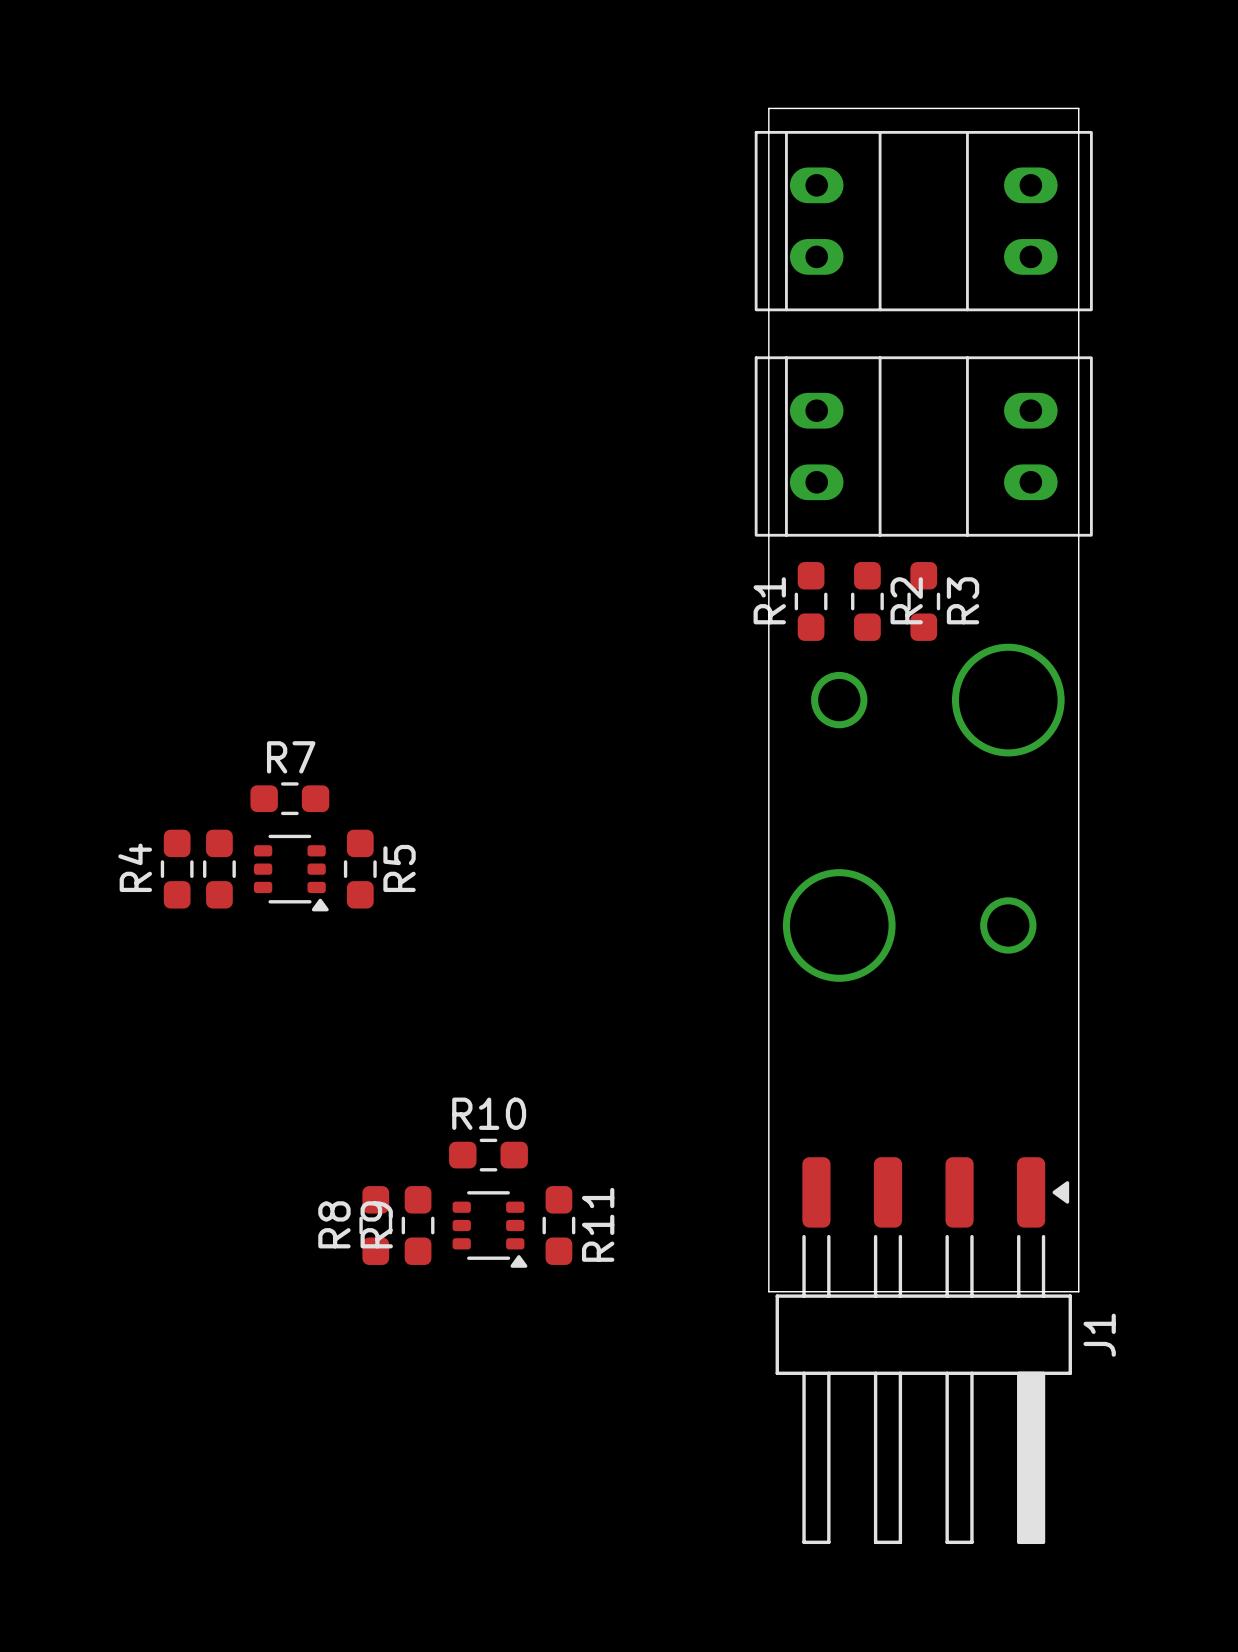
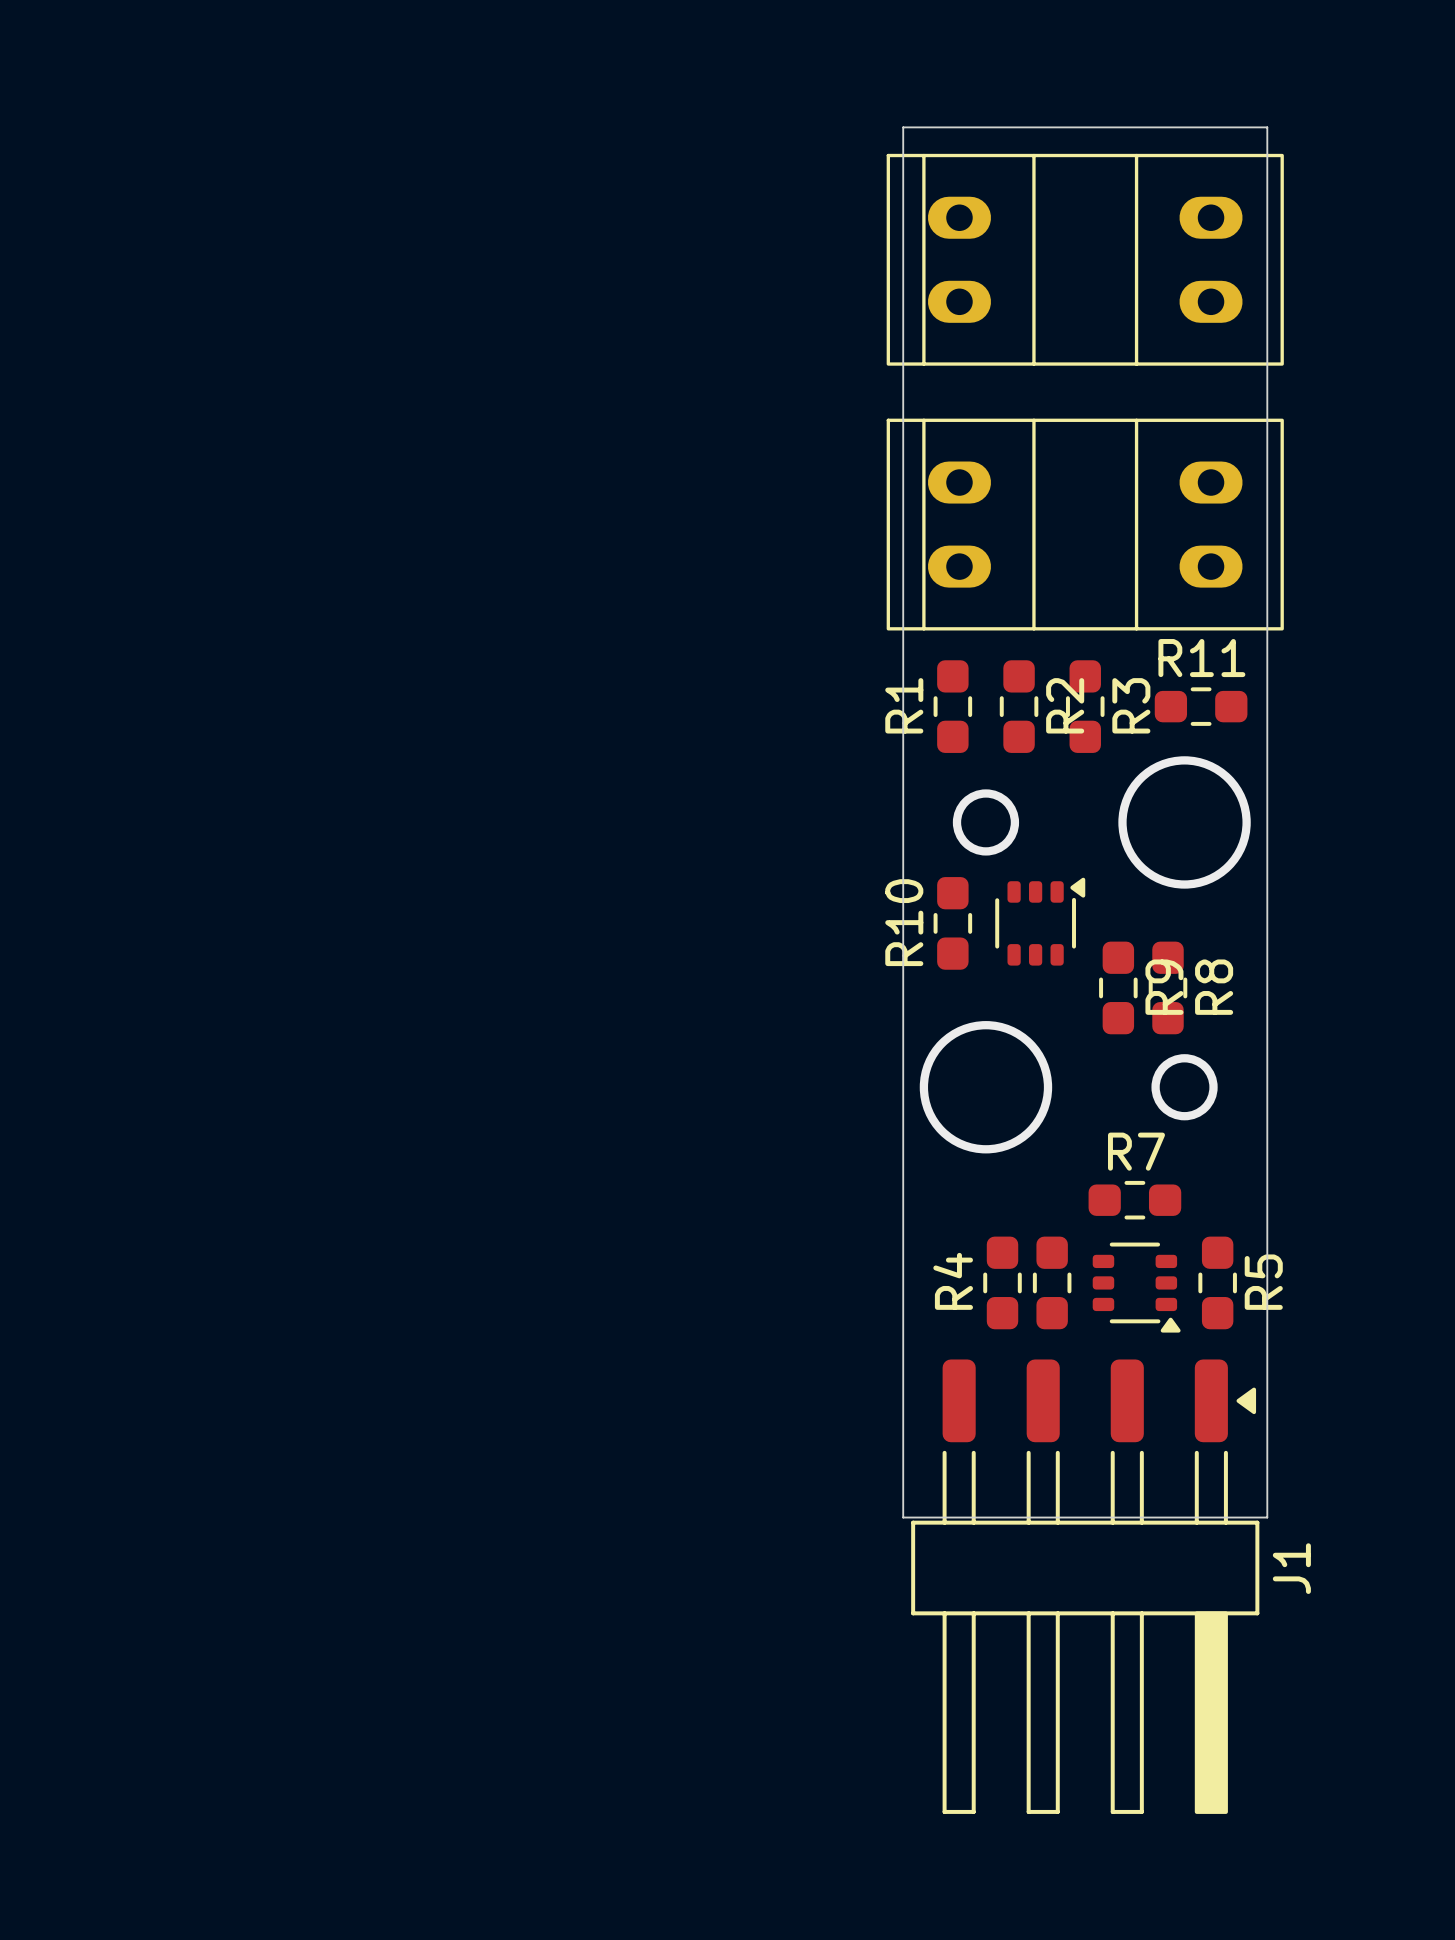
part: none -> (1040, 921)
R7 position: (289, 798) -> (1134, 1200)
R4 position: (177, 869) -> (1002, 1282)
part: (219, 869) -> none
R5 position: (360, 869) -> (1217, 1282)
part: (291, 873) -> none
part: none -> (1052, 1282)
part: none -> (1136, 1287)
R10 name position: R10 (489, 1113) -> R10 (904, 922)
R10 rotation: 0° (488, 1155) -> 90° clockwise (952, 923)
R10 position: (488, 1155) -> (952, 923)
R8 name position: R8 (334, 1224) -> R8 (1214, 987)
R9 name position: R9 (376, 1224) -> R9 (1164, 987)
R11 name position: R11 (598, 1224) -> R11 (1201, 658)
R8 position: (375, 1225) -> (1168, 987)
R9 position: (418, 1225) -> (1118, 987)
R11 rotation: 0° (558, 1225) -> 90° clockwise (1201, 706)
R11 position: (558, 1225) -> (1201, 706)
part: (489, 1229) -> none

